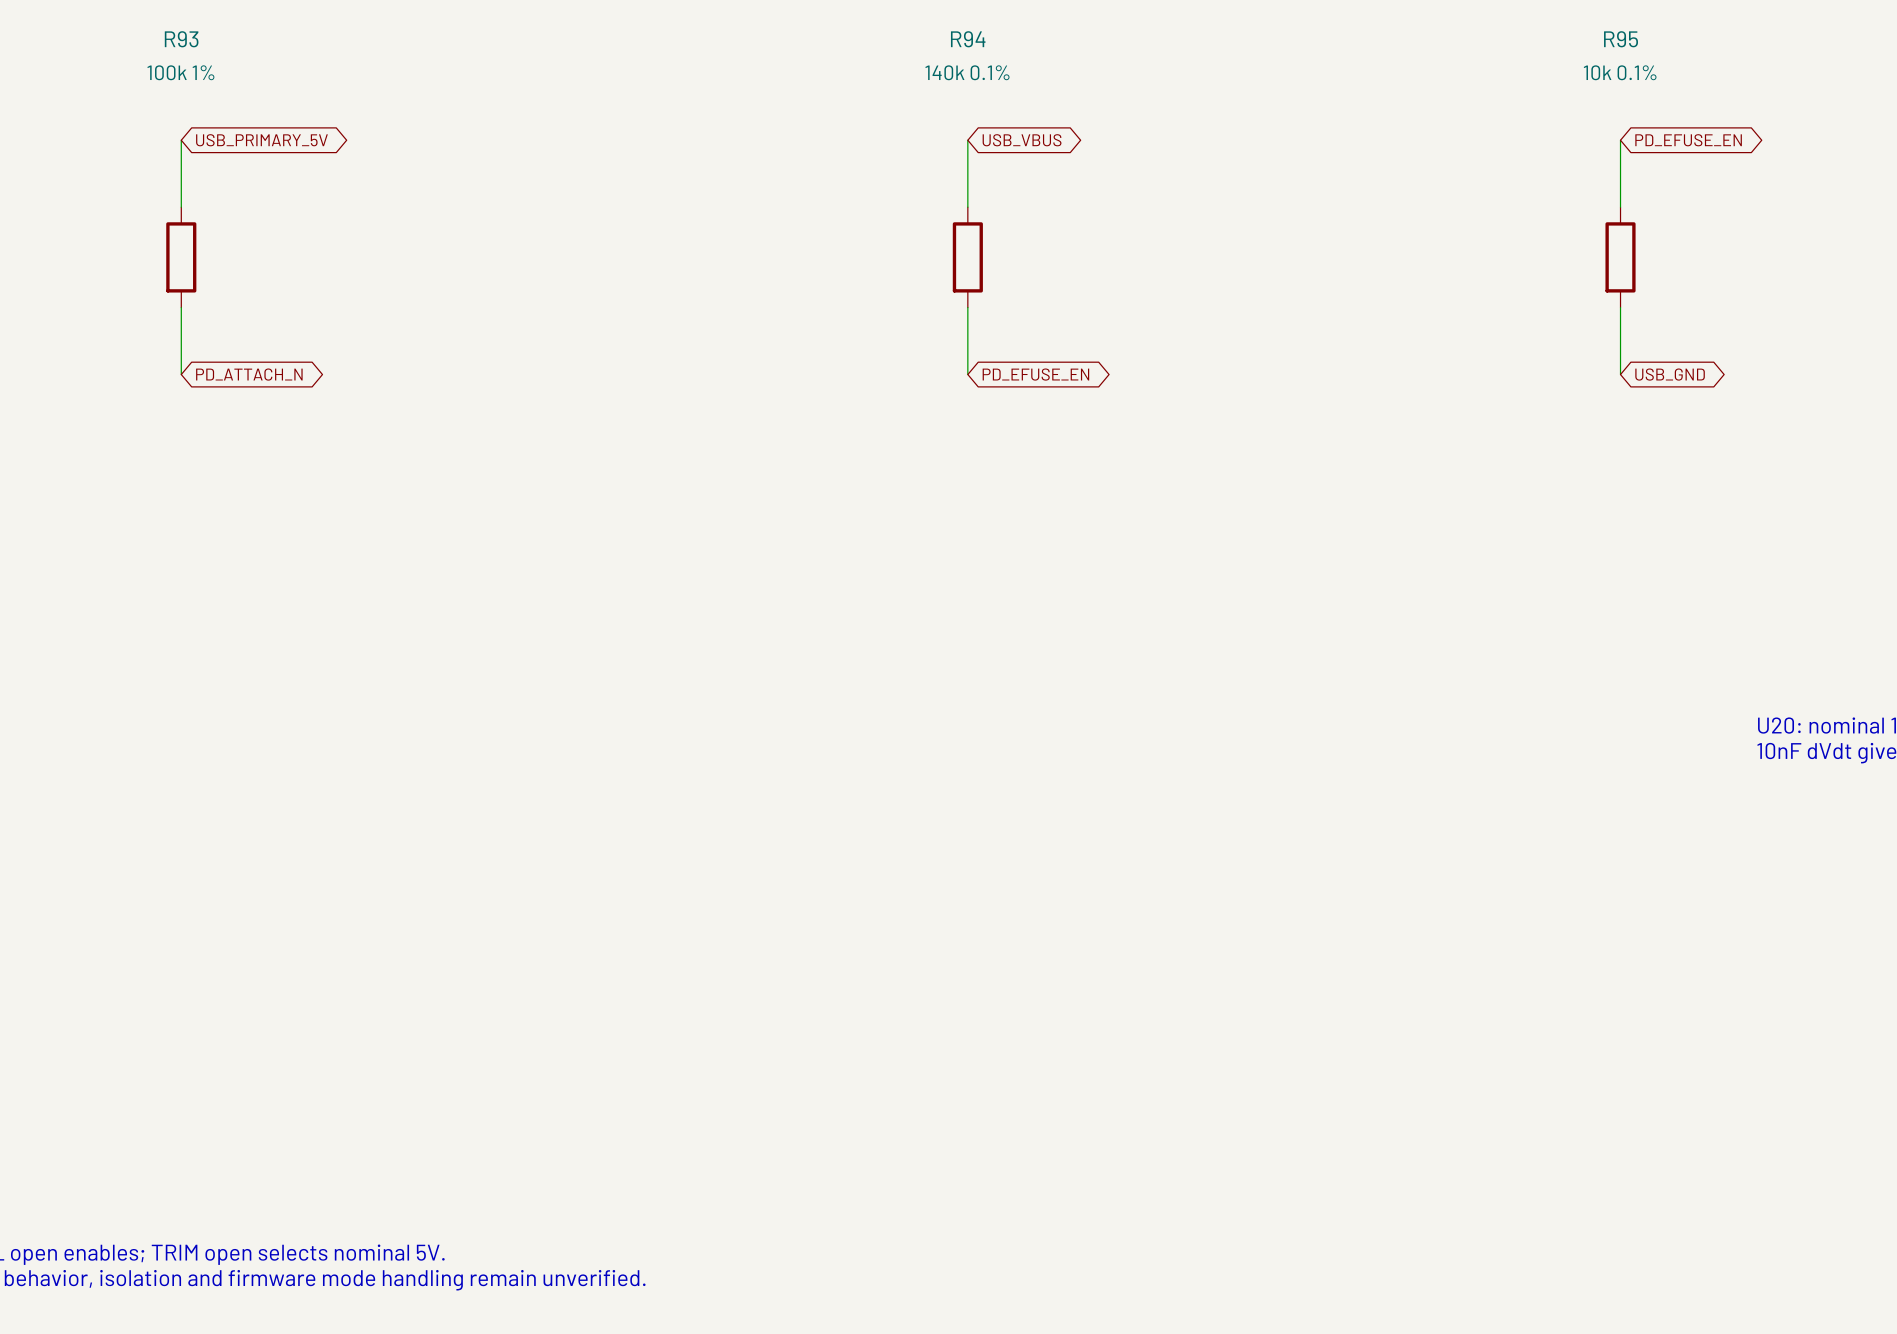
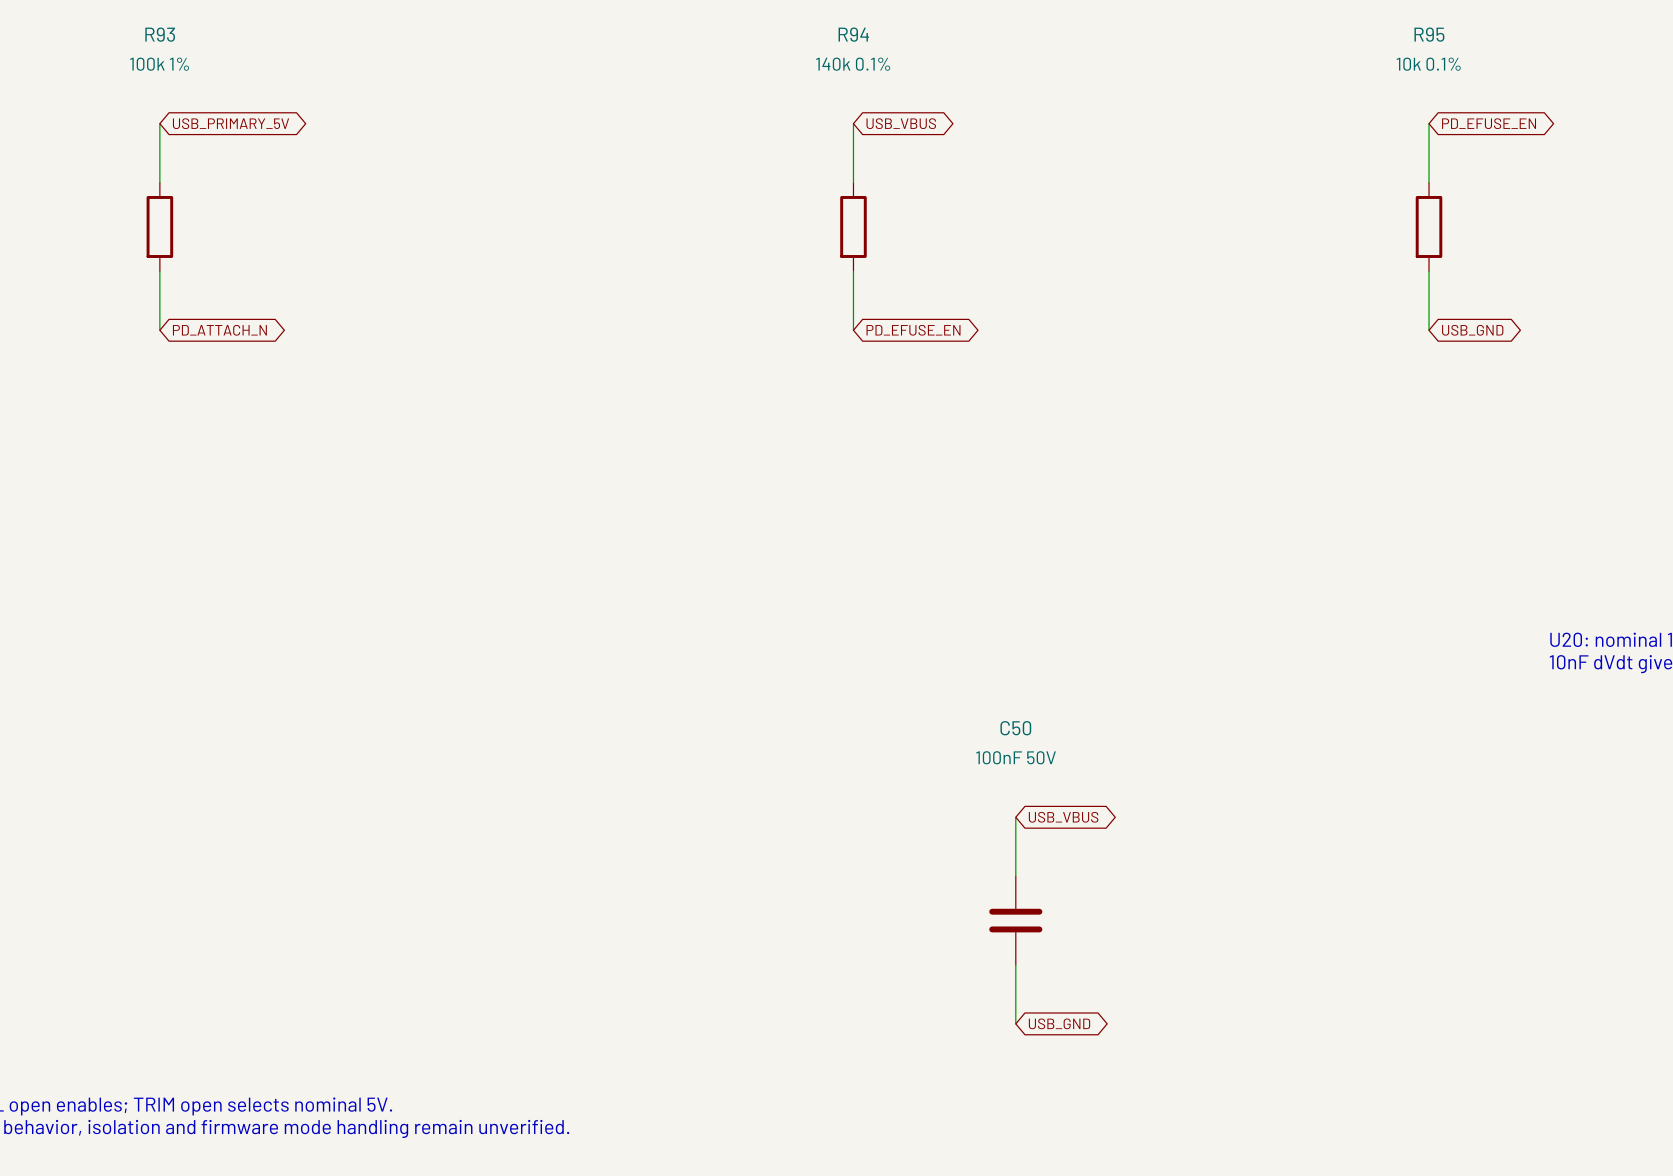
wire: none -> (1015, 817) (1015, 876)
global label: none -> USB_VBUS (1063, 817)
C50: none -> 100nF 50V (1015, 920)
wire: none -> (1015, 964) (1015, 1023)
global label: none -> USB_GND (1059, 1023)

